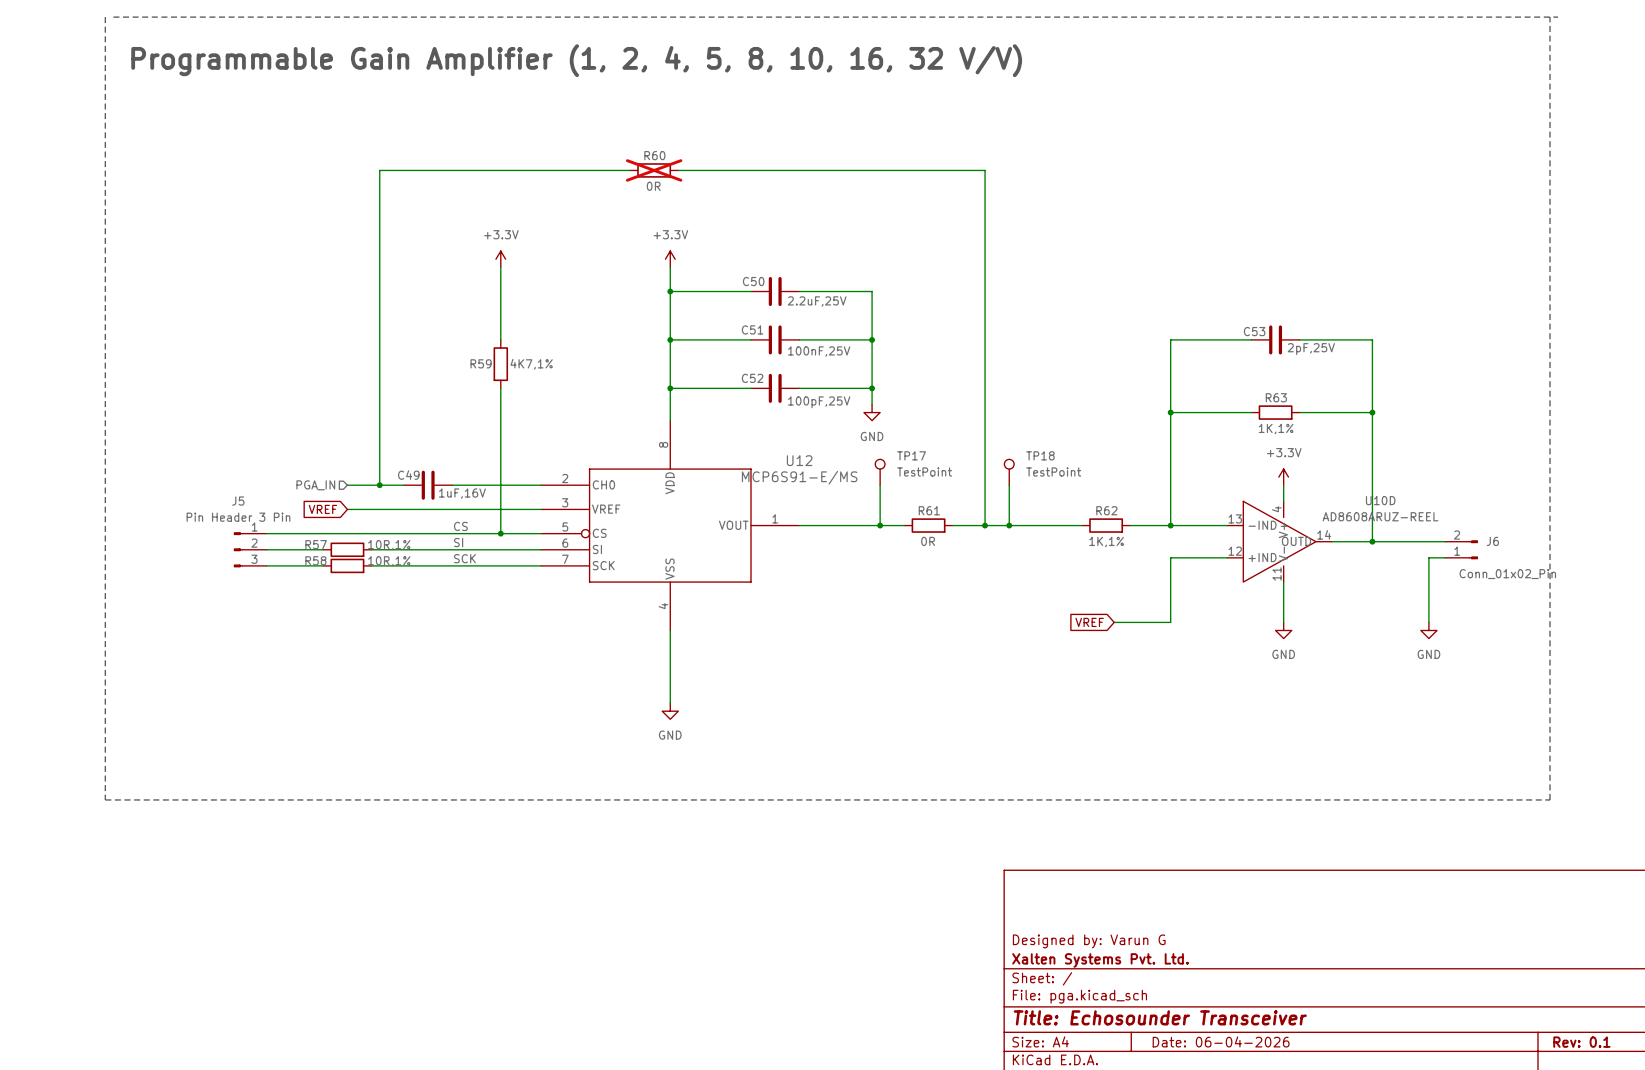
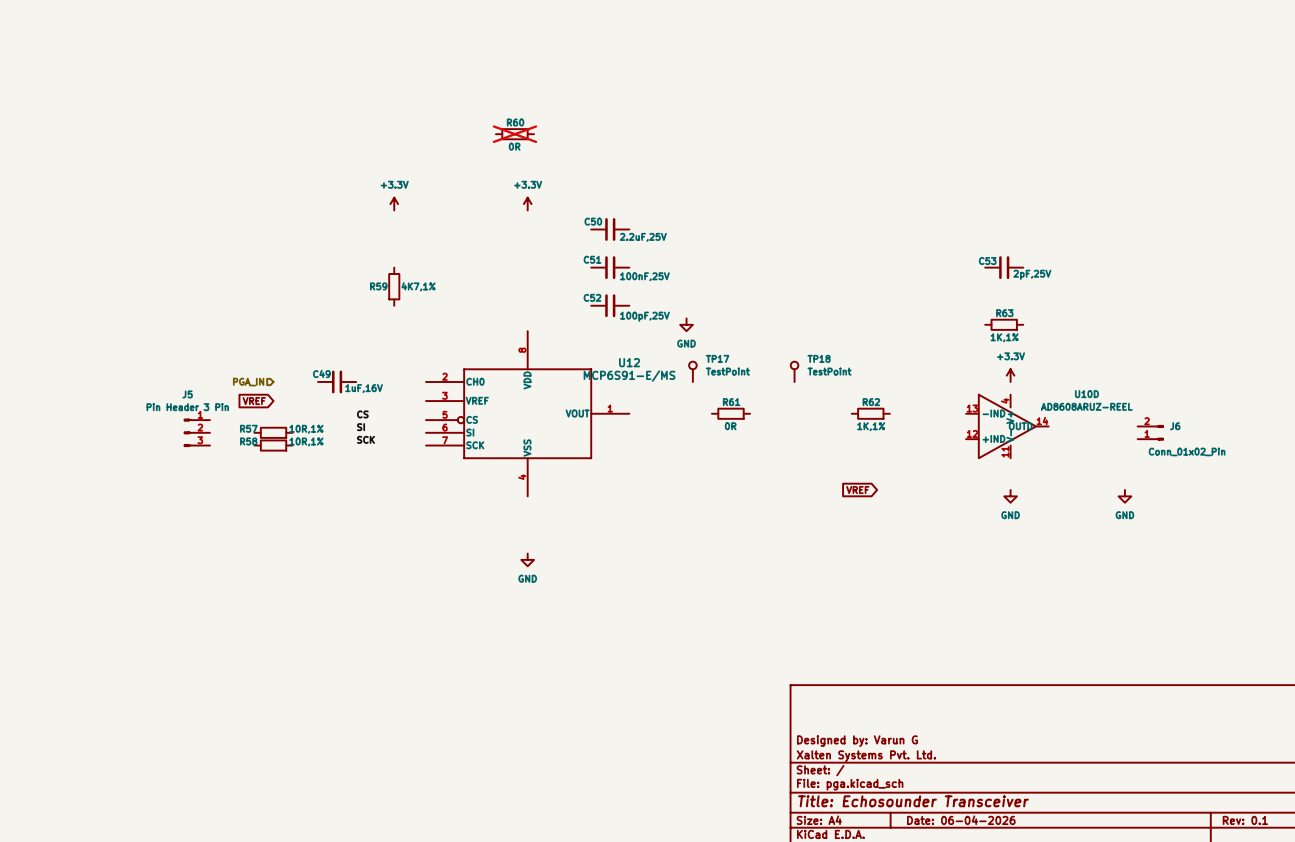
line: (105, 17) (105, 799) (1550, 799) (1550, 17) -> none
line: (113, 17) (1558, 17) -> none
text: Programmable Gain Amplifier (1, 2, 4, 5, 8, 10, 16, 32 V/V) (576, 60) -> none
wire: (629, 170) (379, 170) (379, 485) -> none
wire: (678, 170) (985, 170) (985, 525) -> none
wire: (500, 267) (500, 339) -> none
wire: (670, 267) (670, 420) -> none
wire: (670, 291) (750, 291) -> none
junction: (670, 291) -> none
wire: (799, 291) (872, 291) (872, 404) -> none
wire: (670, 339) (750, 339) -> none
junction: (670, 339) -> none
wire: (799, 339) (872, 339) -> none
junction: (872, 339) -> none
wire: (1251, 339) (1170, 339) (1170, 525) -> none
wire: (1299, 339) (1372, 339) (1372, 541) -> none
wire: (500, 388) (500, 533) -> none
wire: (670, 388) (750, 388) -> none
junction: (670, 388) -> none
wire: (799, 388) (872, 388) -> none
junction: (872, 388) -> none
wire: (1170, 412) (1251, 412) -> none
junction: (1170, 412) -> none
wire: (1299, 412) (1372, 412) -> none
junction: (1372, 412) -> none
wire: (347, 485) (403, 485) -> none
junction: (379, 485) -> none
wire: (452, 485) (541, 485) -> none
wire: (880, 485) (880, 525) -> none
wire: (1009, 485) (1009, 525) -> none
wire: (1283, 485) (1283, 501) -> none
wire: (347, 509) (541, 509) -> none
wire: (799, 525) (904, 525) -> none
junction: (880, 525) -> none
wire: (952, 525) (1081, 525) -> none
junction: (985, 525) -> none
junction: (1009, 525) -> none
wire: (1130, 525) (1227, 525) -> none
junction: (1170, 525) -> none
wire: (266, 533) (541, 533) -> none
junction: (500, 533) -> none
wire: (1332, 541) (1445, 541) -> none
junction: (1372, 541) -> none
wire: (266, 549) (323, 549) -> none
wire: (371, 549) (541, 549) -> none
wire: (1227, 557) (1170, 557) (1170, 622) (1114, 622) -> none
wire: (1445, 557) (1428, 557) (1428, 622) -> none
wire: (266, 565) (323, 565) -> none
wire: (371, 565) (541, 565) -> none
wire: (1283, 582) (1283, 622) -> none
wire: (670, 630) (670, 703) -> none

